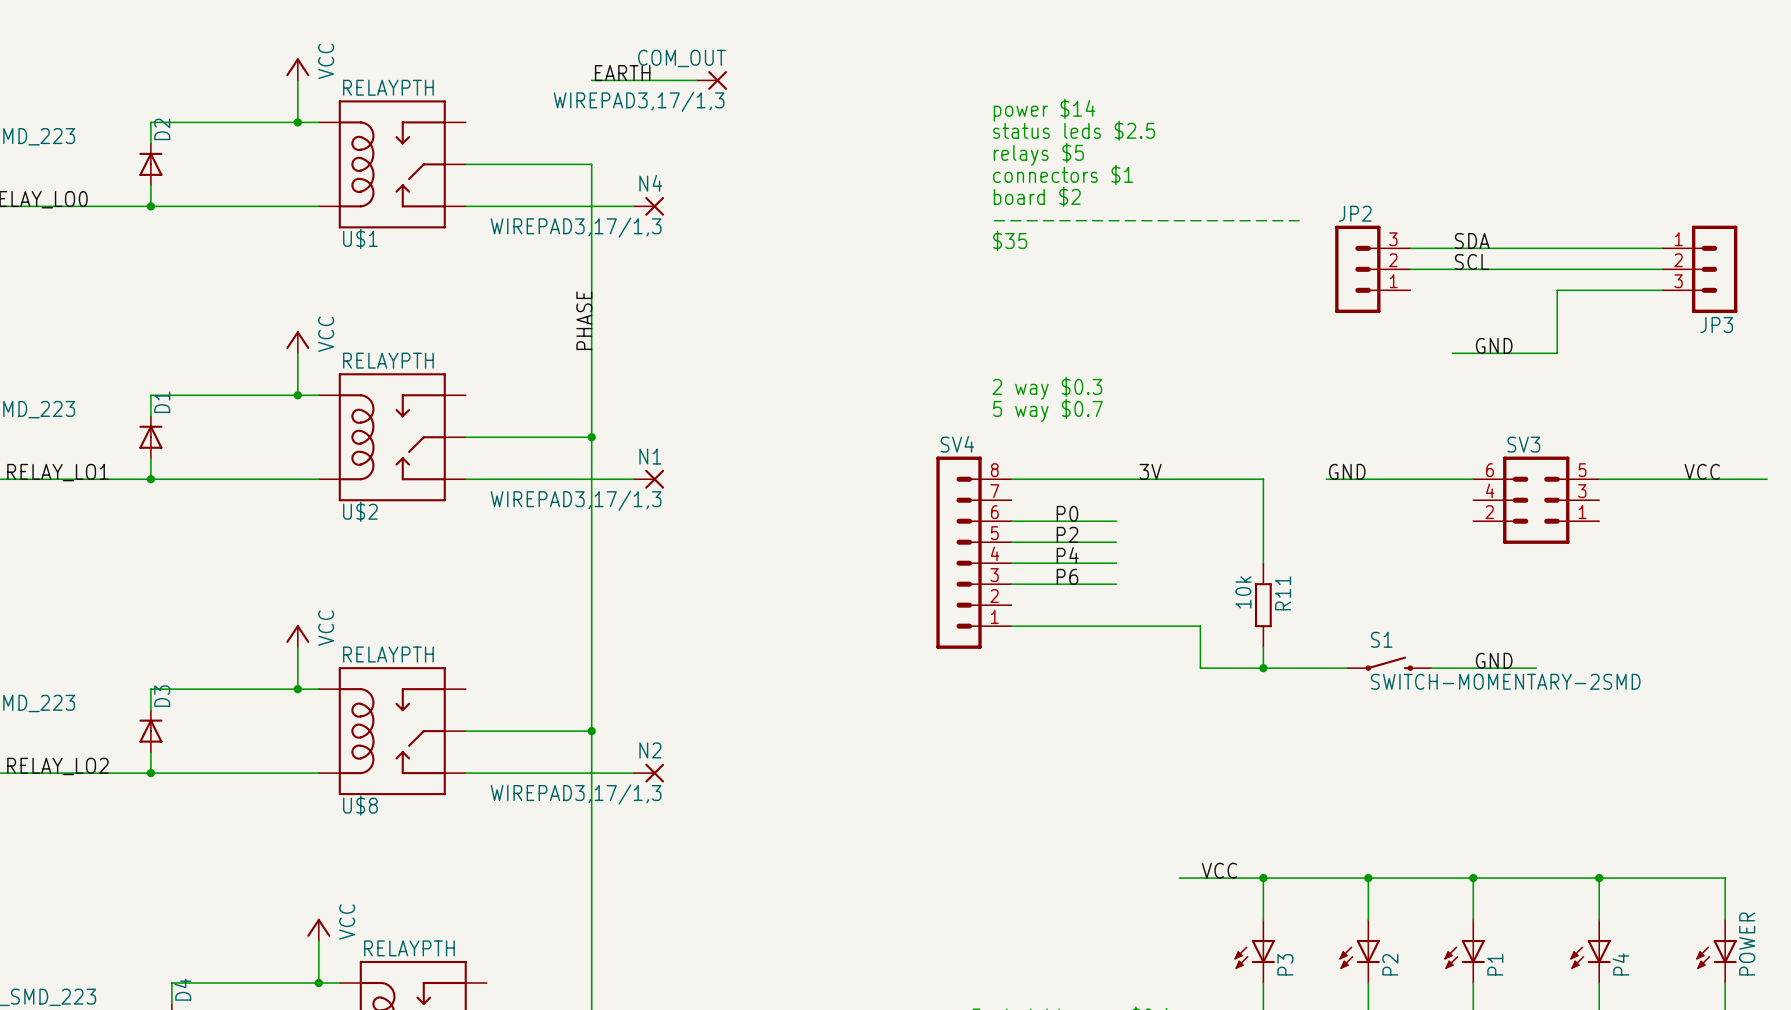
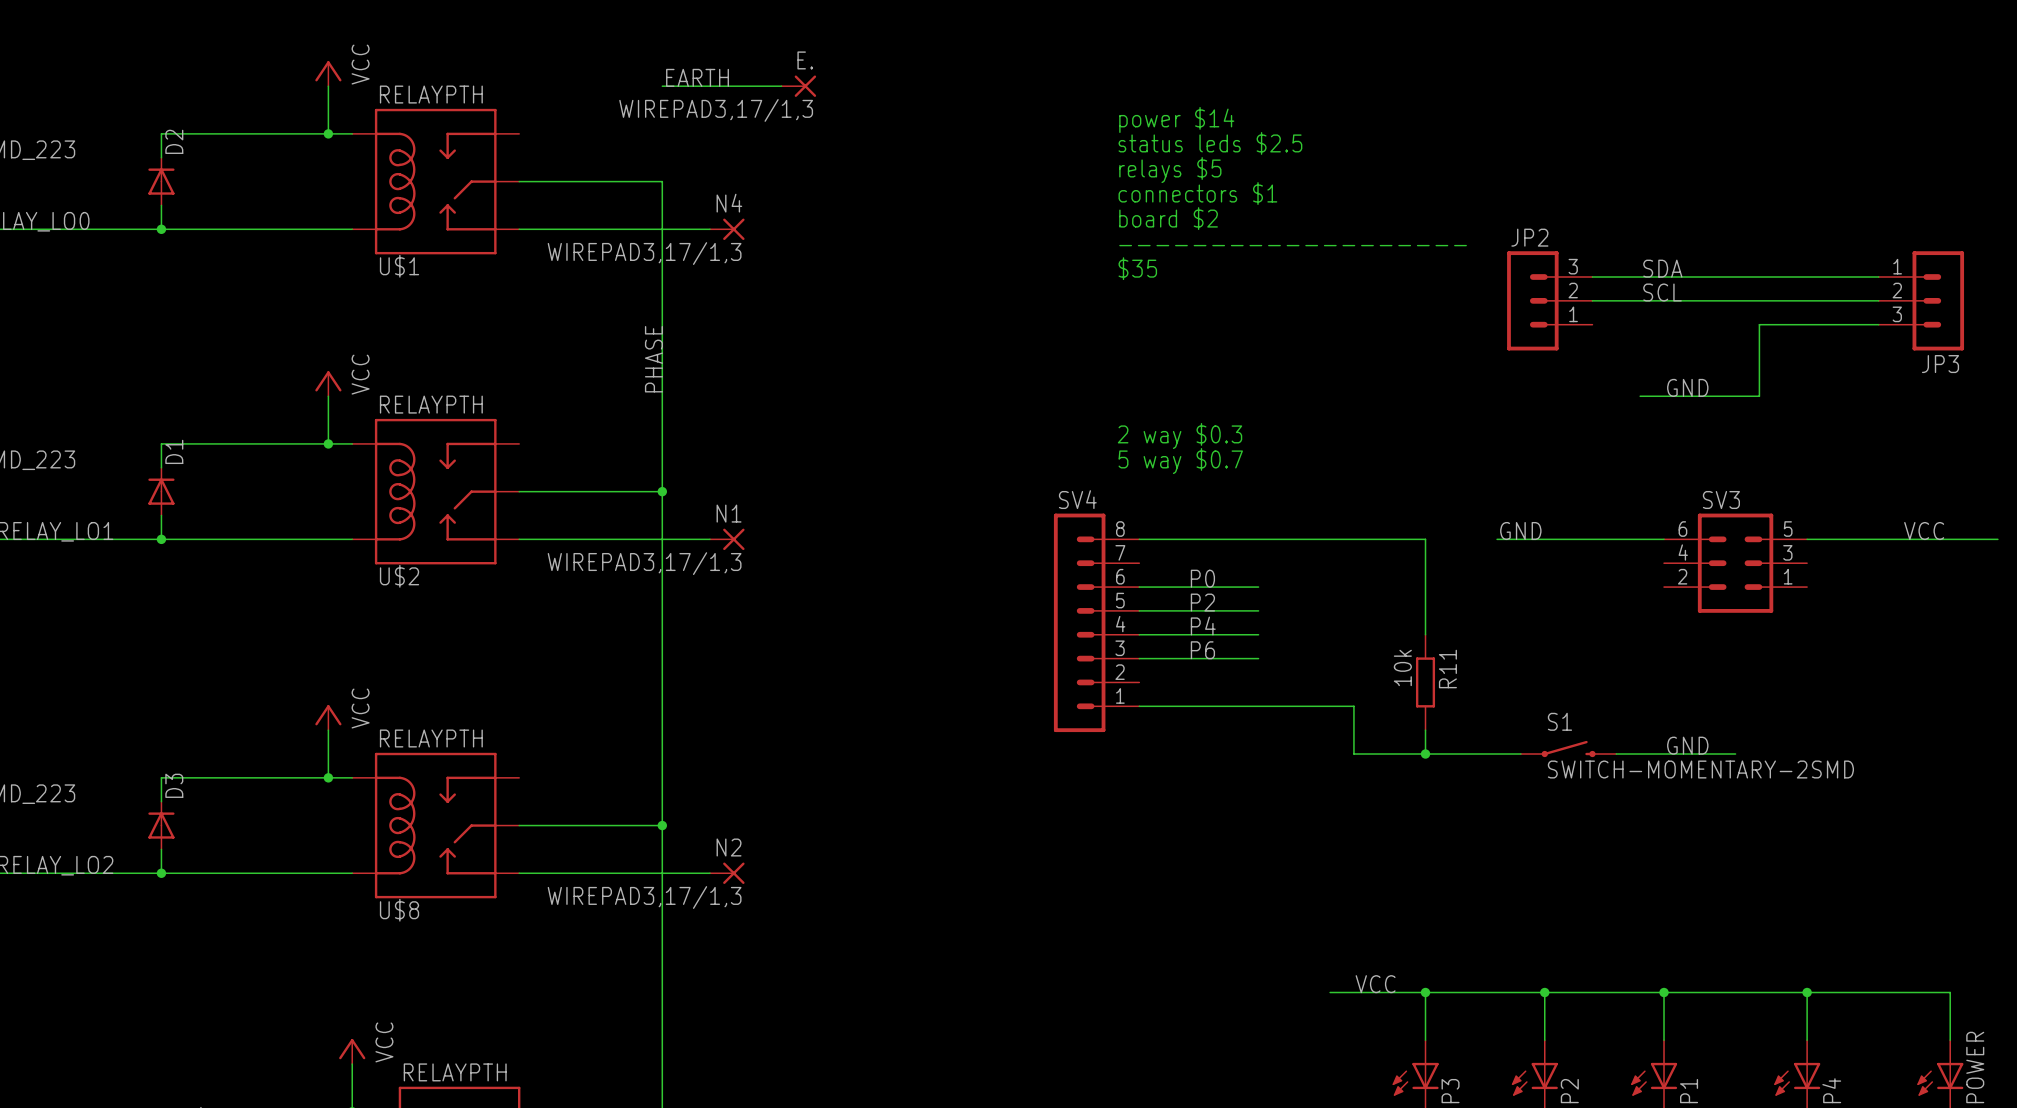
COM_OUT name: COM_OUT (681, 58) -> E. (805, 60)
label: 3V (1150, 471) -> none

